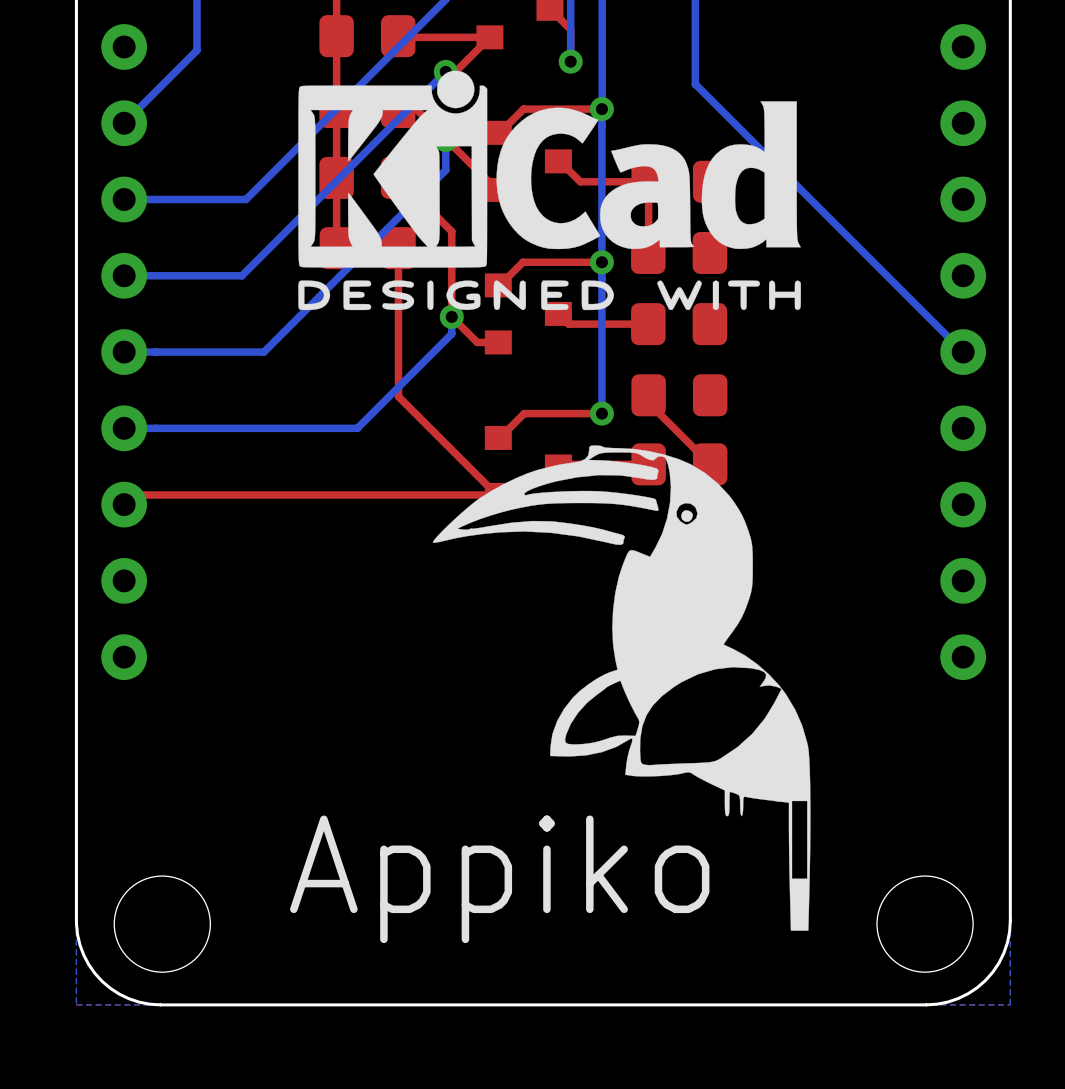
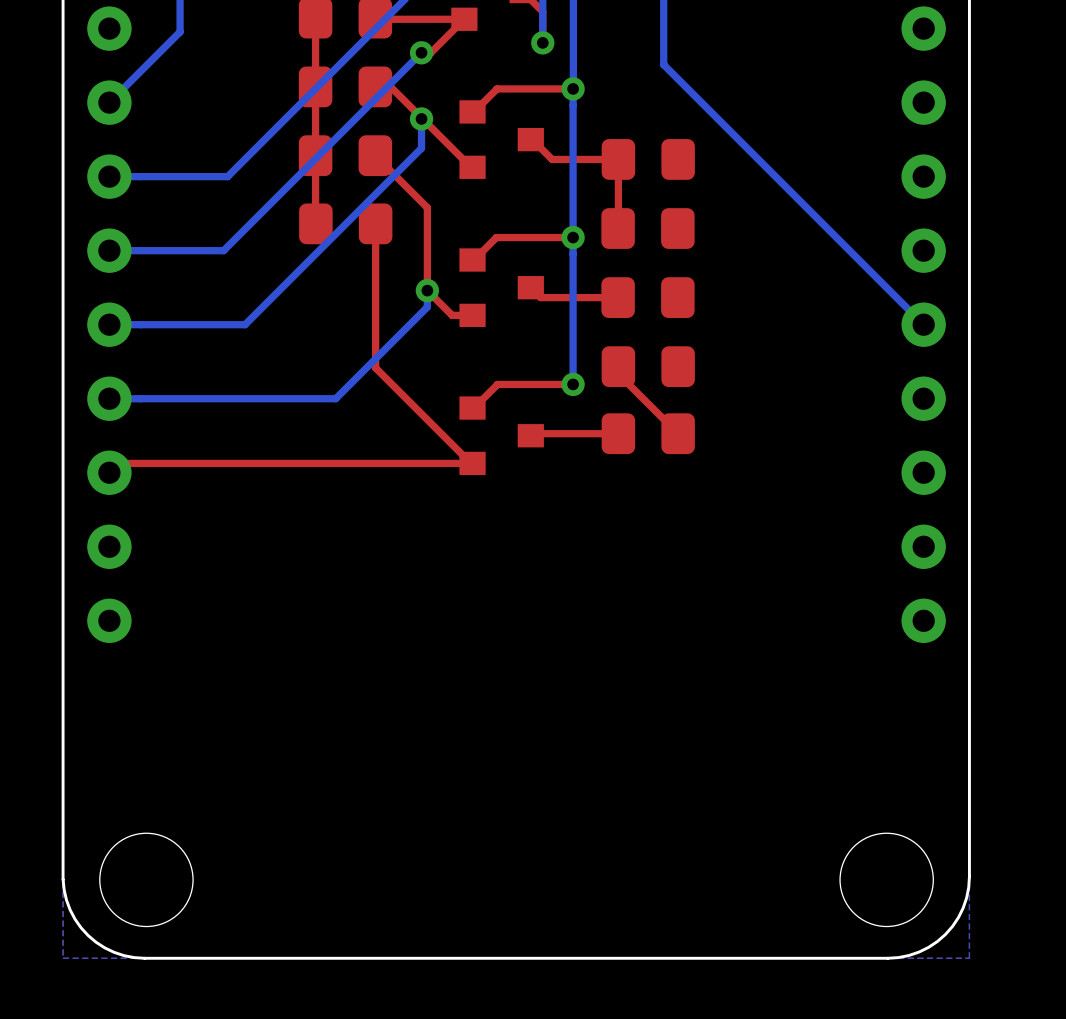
drawing: [298, 70, 801, 311] -> none
drawing: [432, 445, 811, 931] -> none

